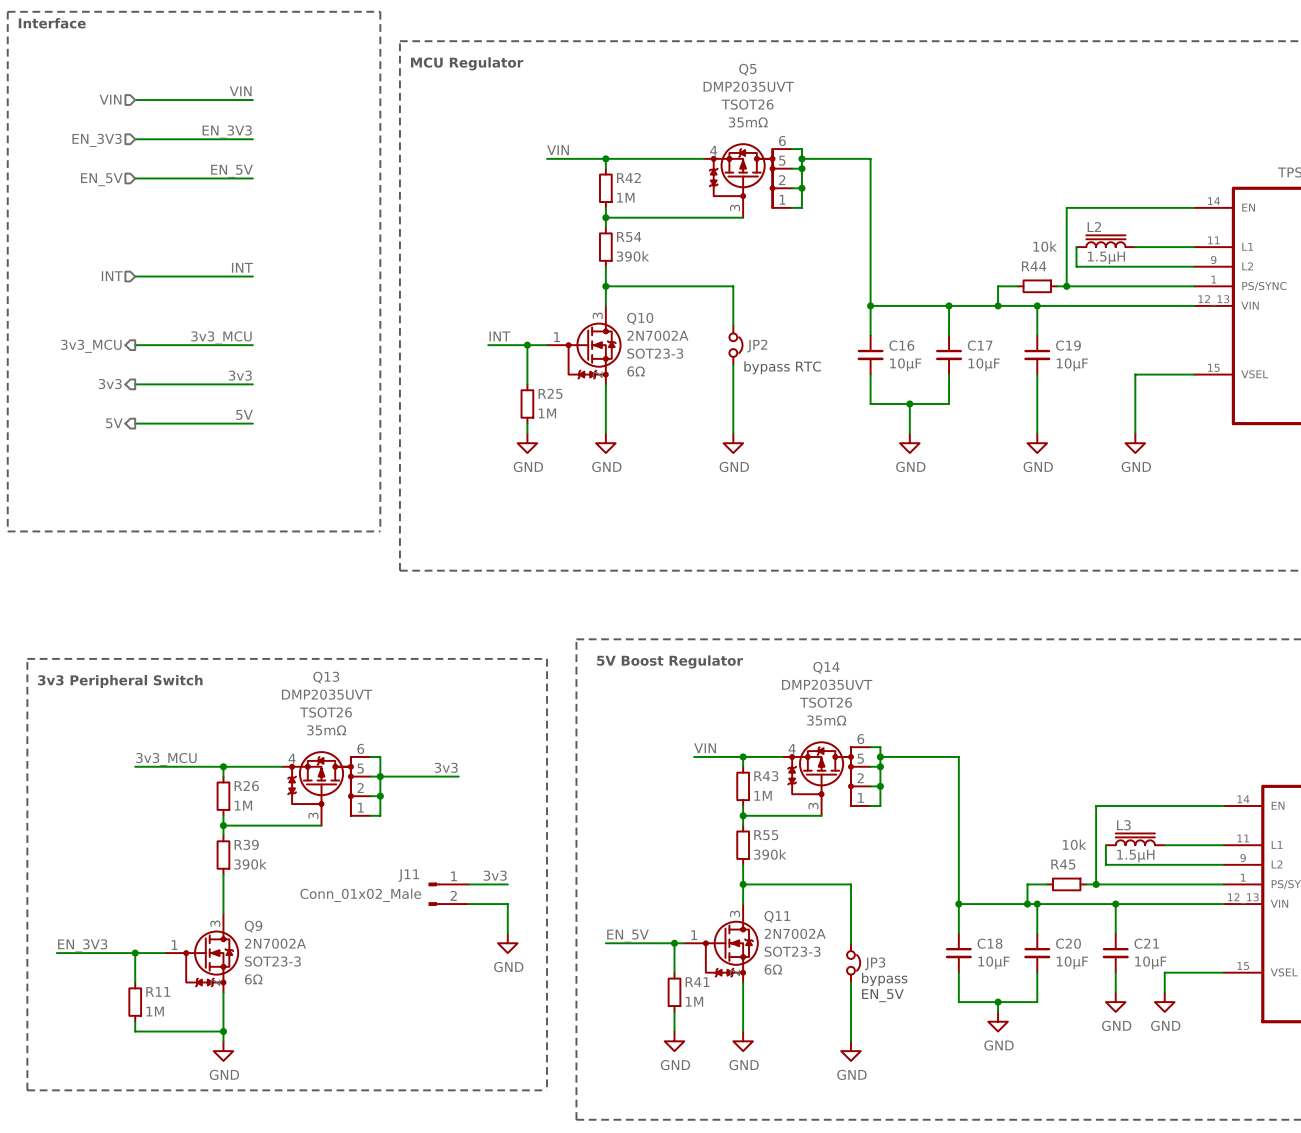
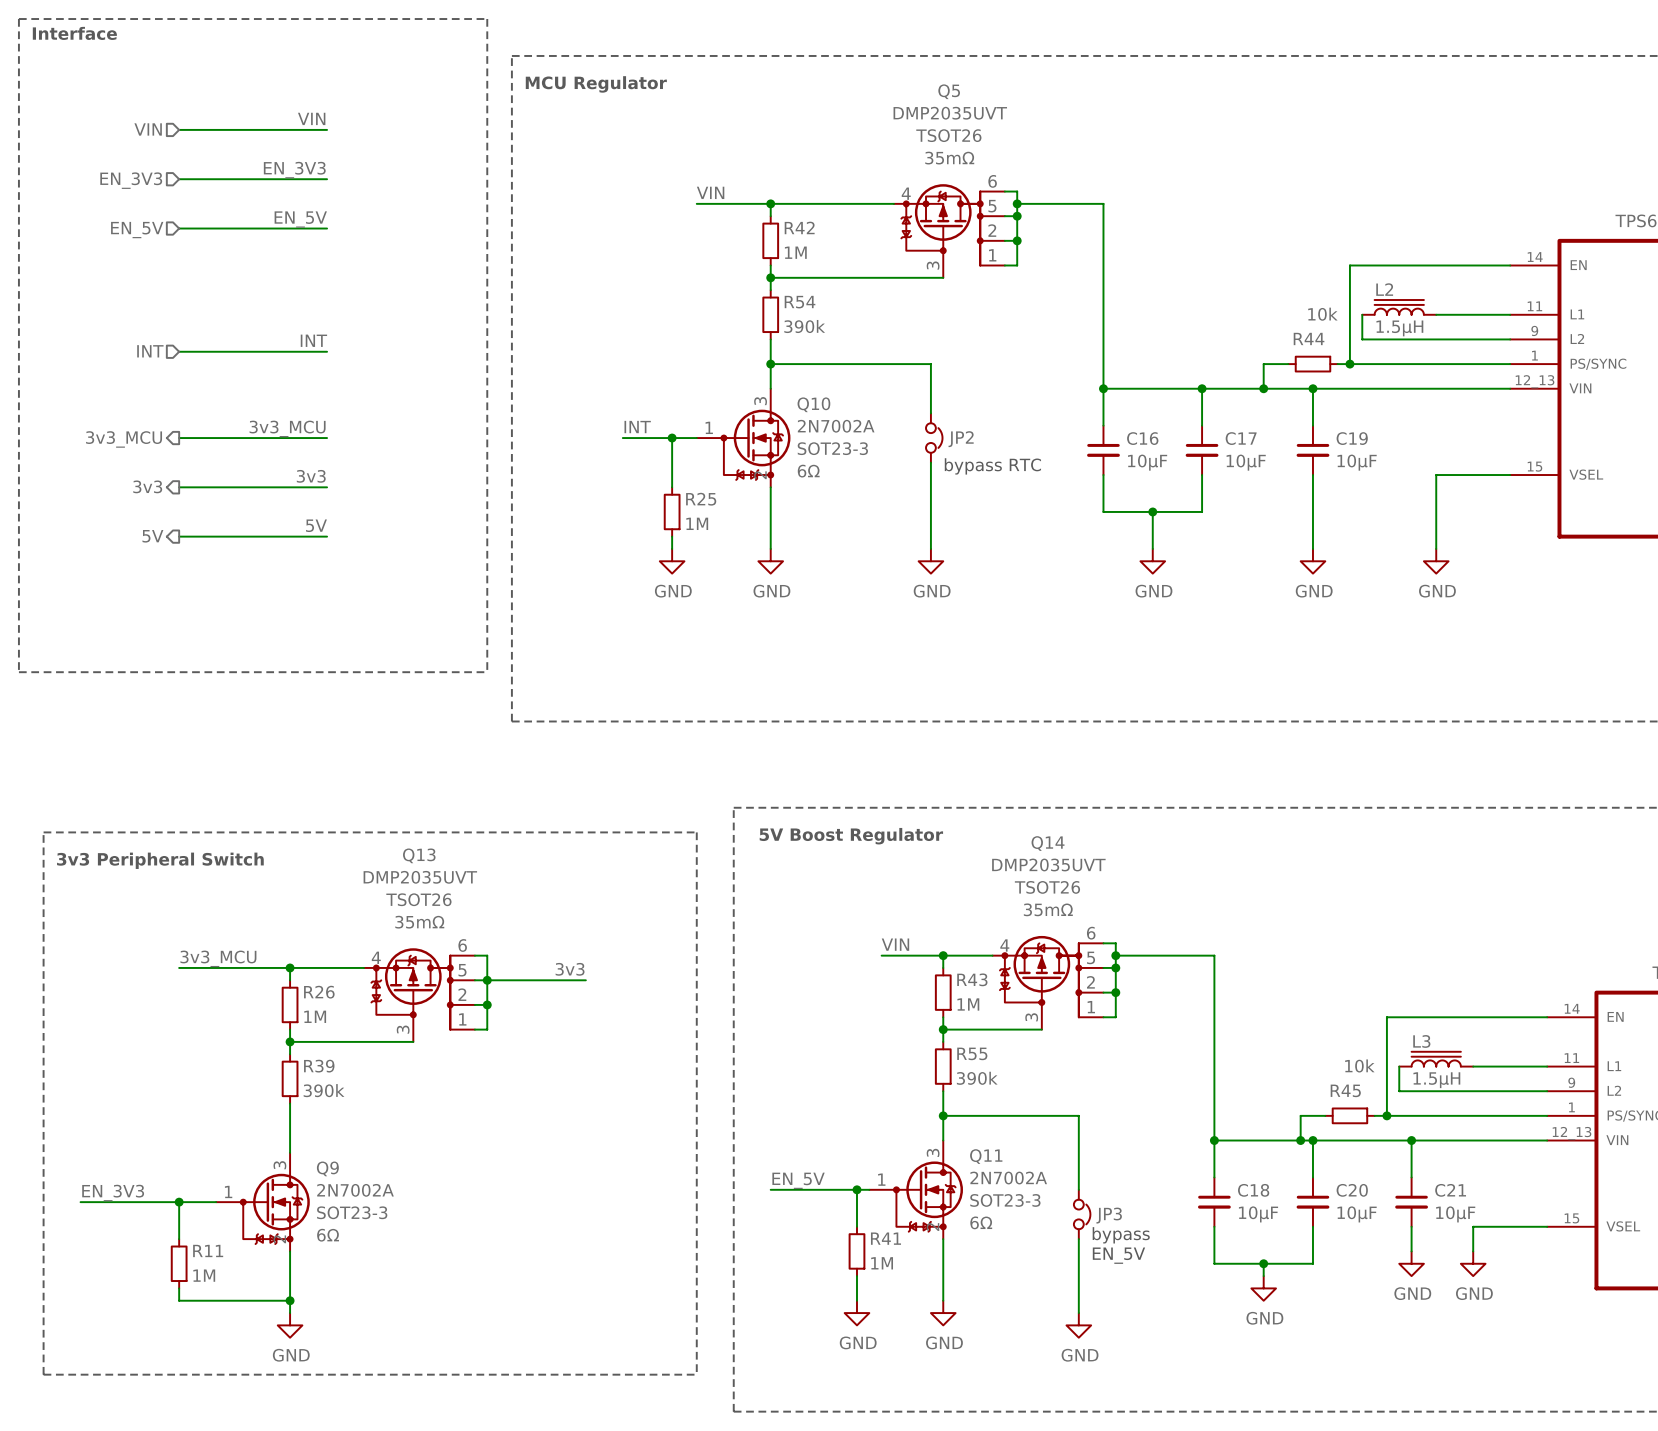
label: 3v3 (495, 875) -> none
wire: (468, 884) (507, 884) -> none
J11: Conn_01x02_Male (448, 894) -> none
wire: (468, 904) (507, 904) (507, 933) -> none
power symbol: GND (507, 943) -> none

